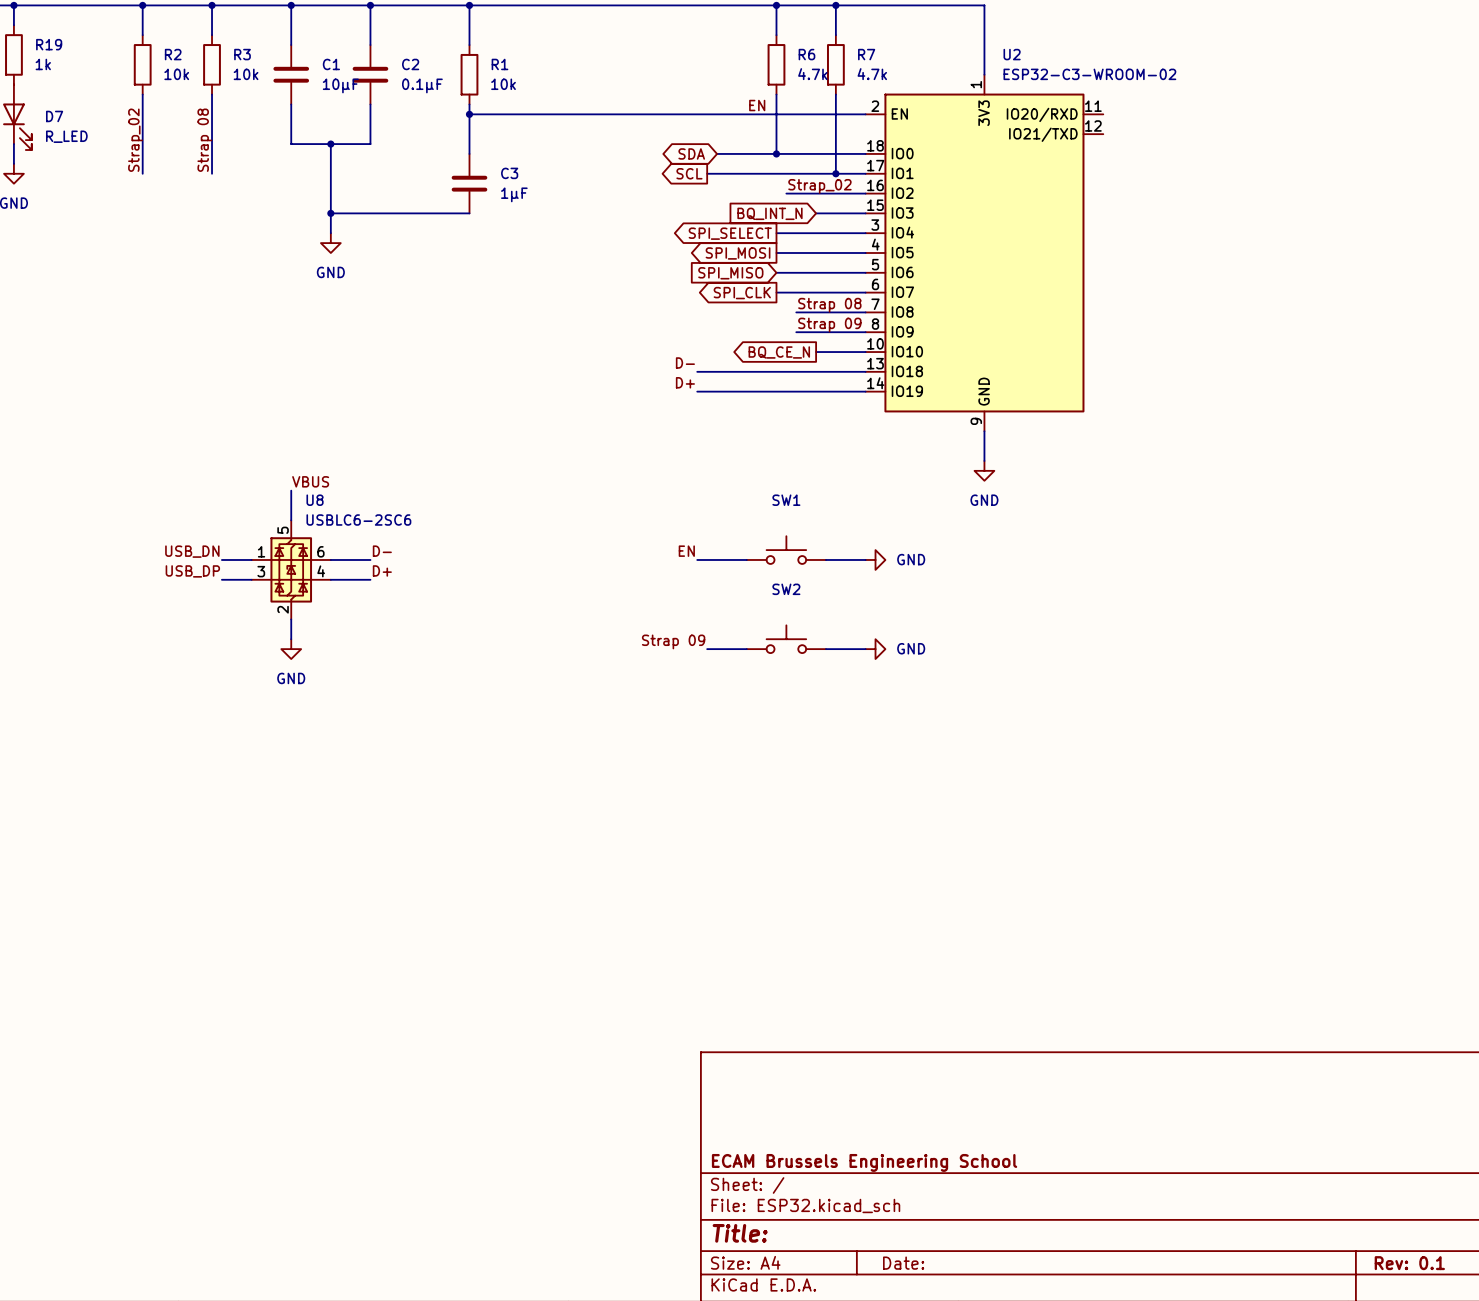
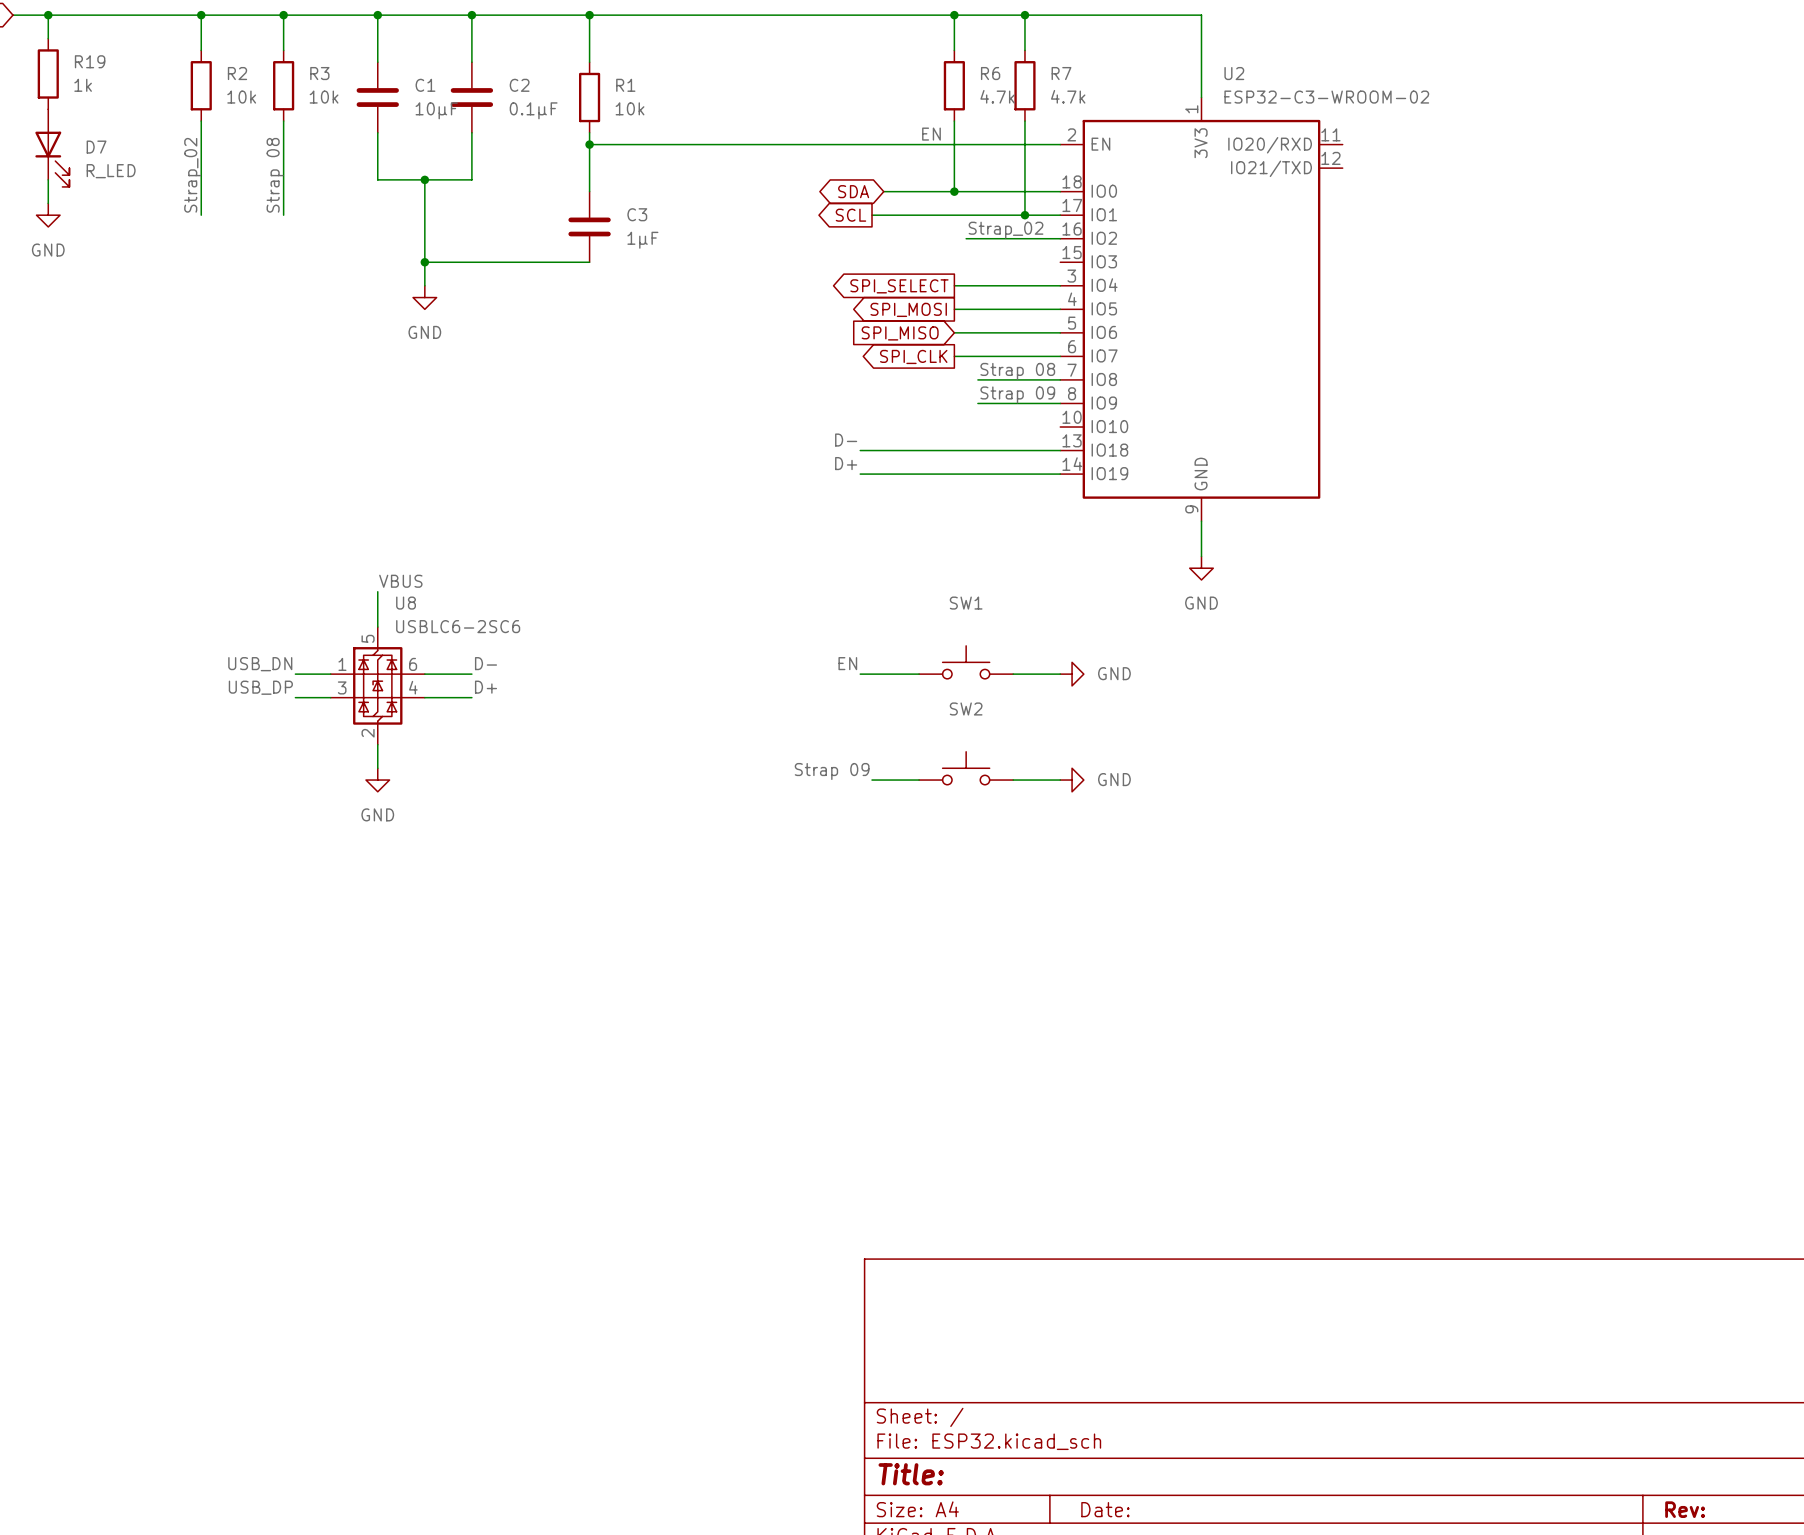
global label: BQ_INT_N (769, 213) -> none
wire: (816, 213) (865, 213) -> none
global label: BQ_CE_N (779, 352) -> none
wire: (816, 352) (865, 352) -> none
title block: ECAM Brussels Engineering School (864, 1162) -> none
title block: Rev: 0.1 (1409, 1263) -> Rev: (1685, 1509)

